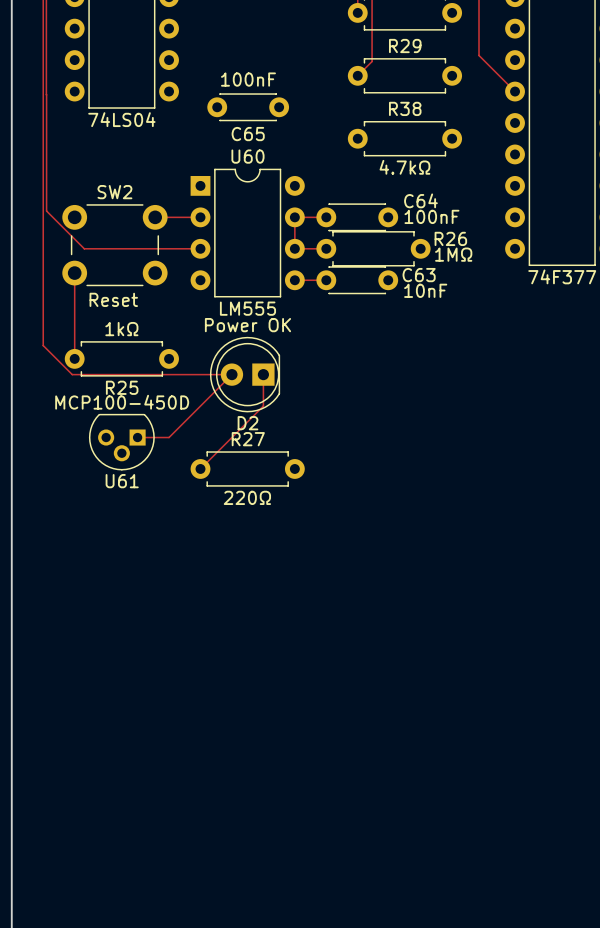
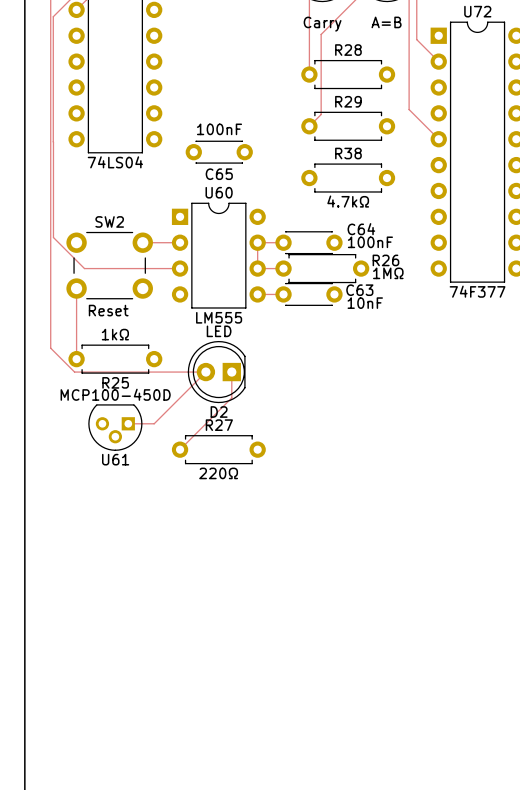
D2 value: Power OK (247, 325) -> LED (219, 331)

